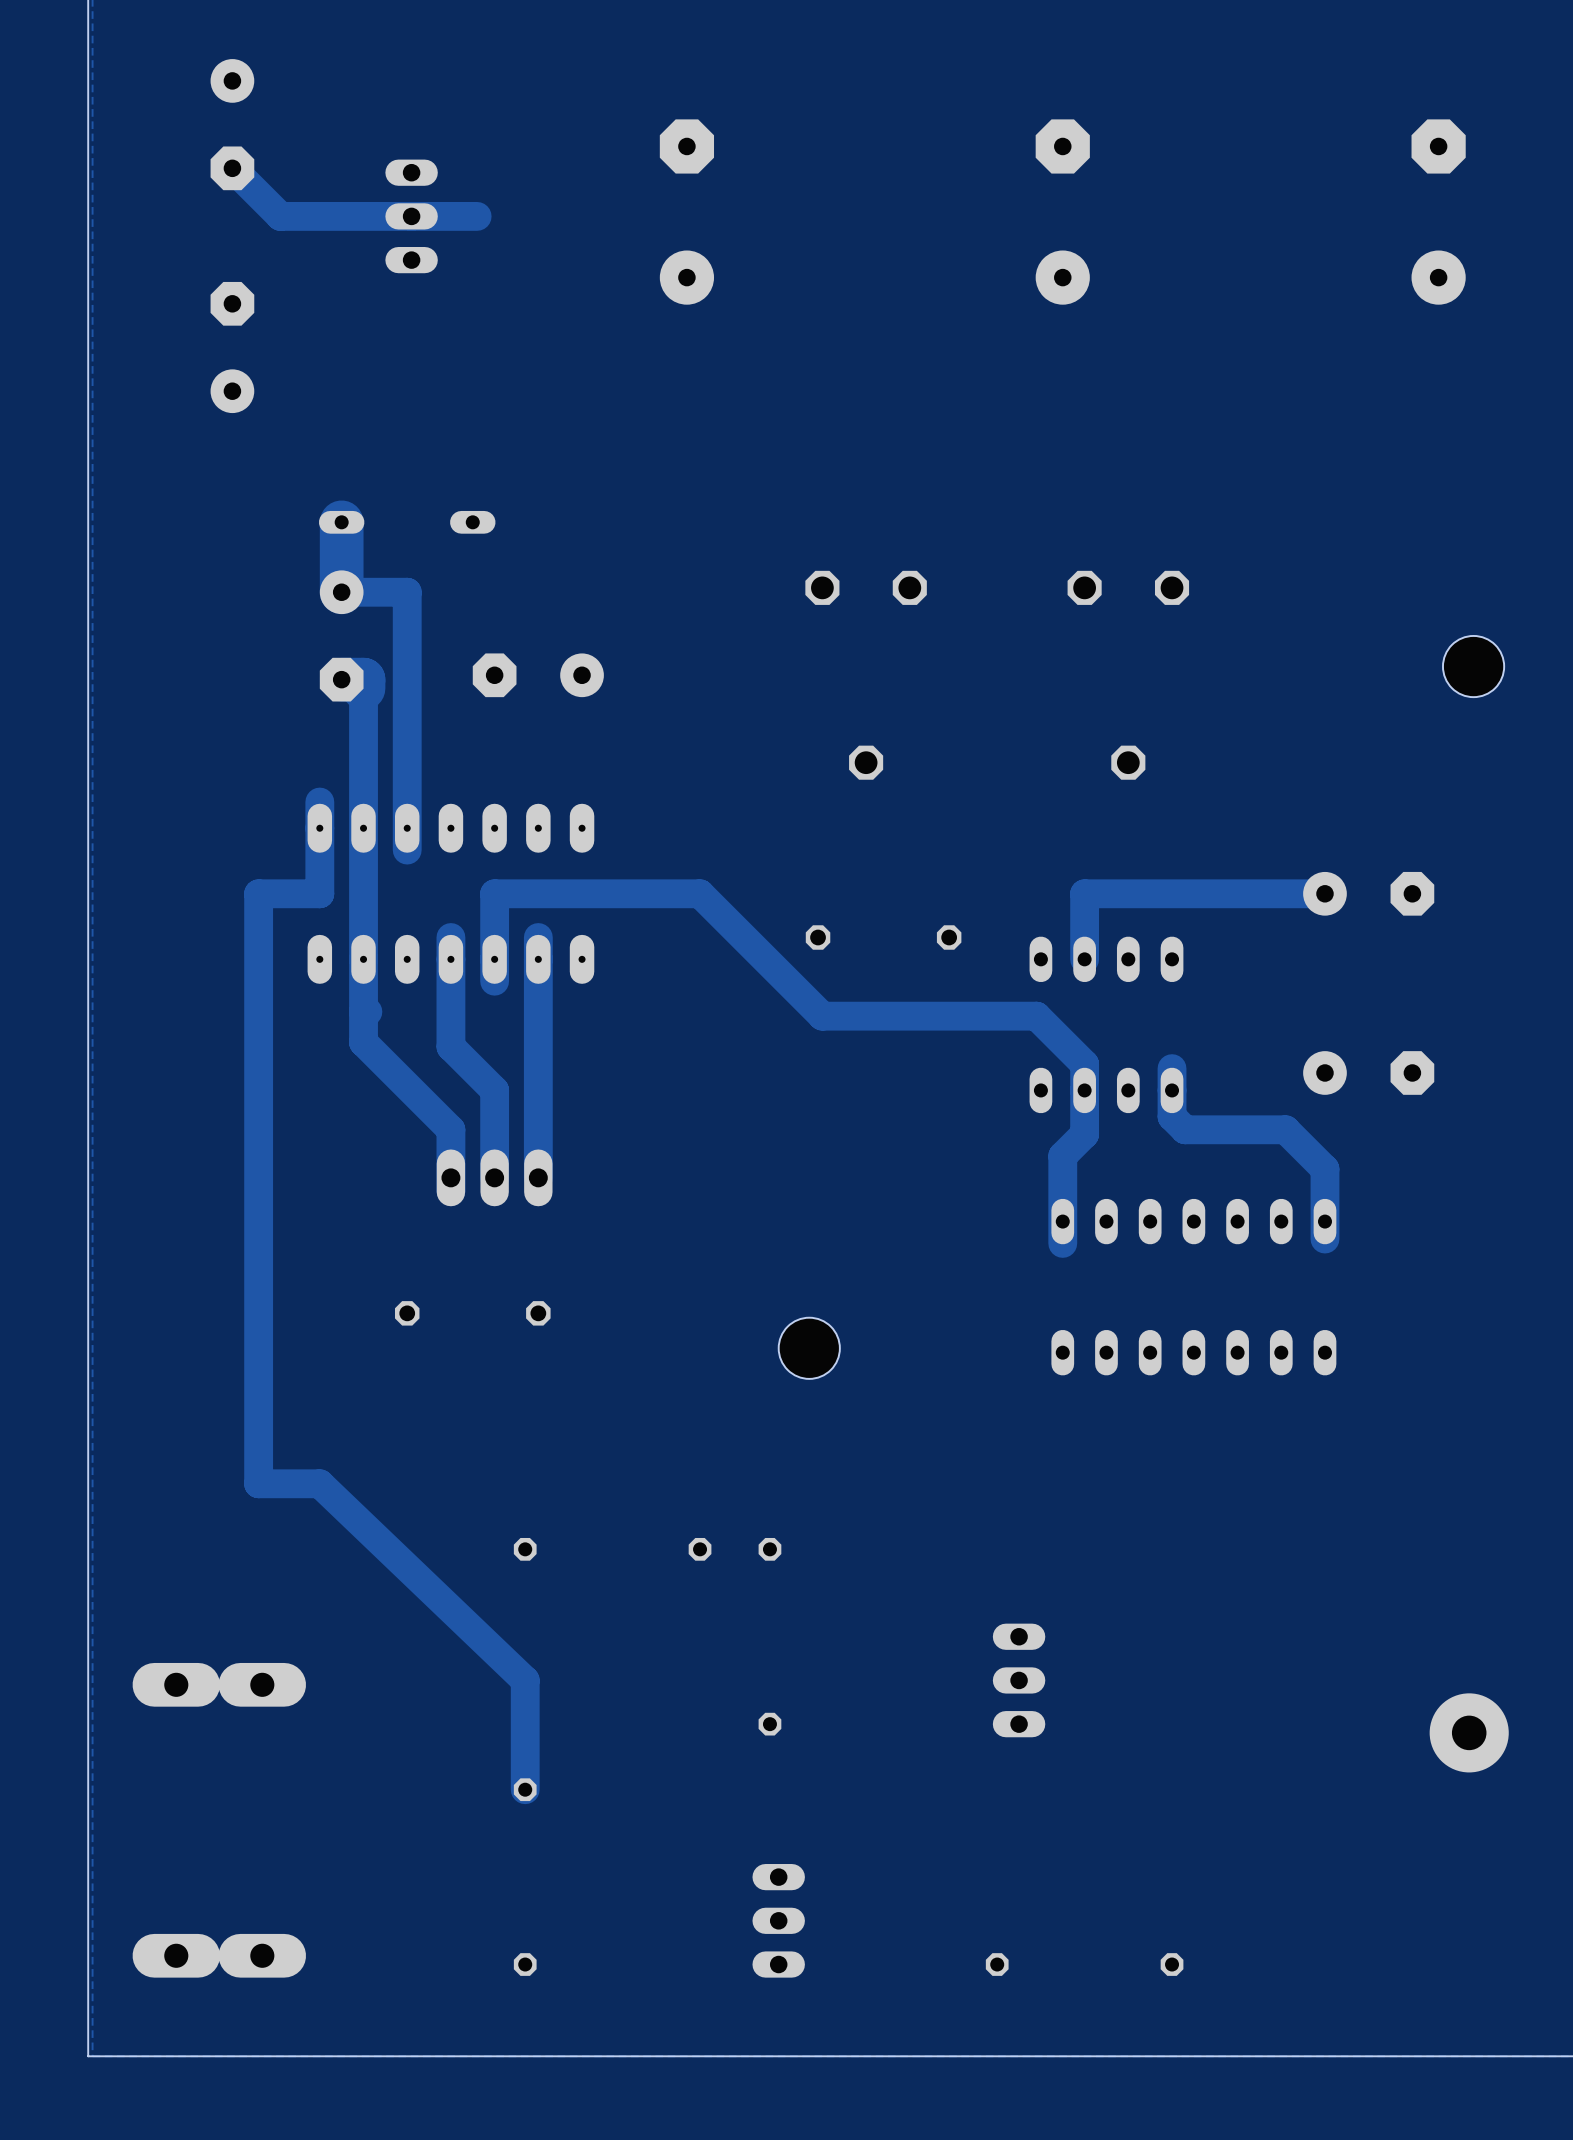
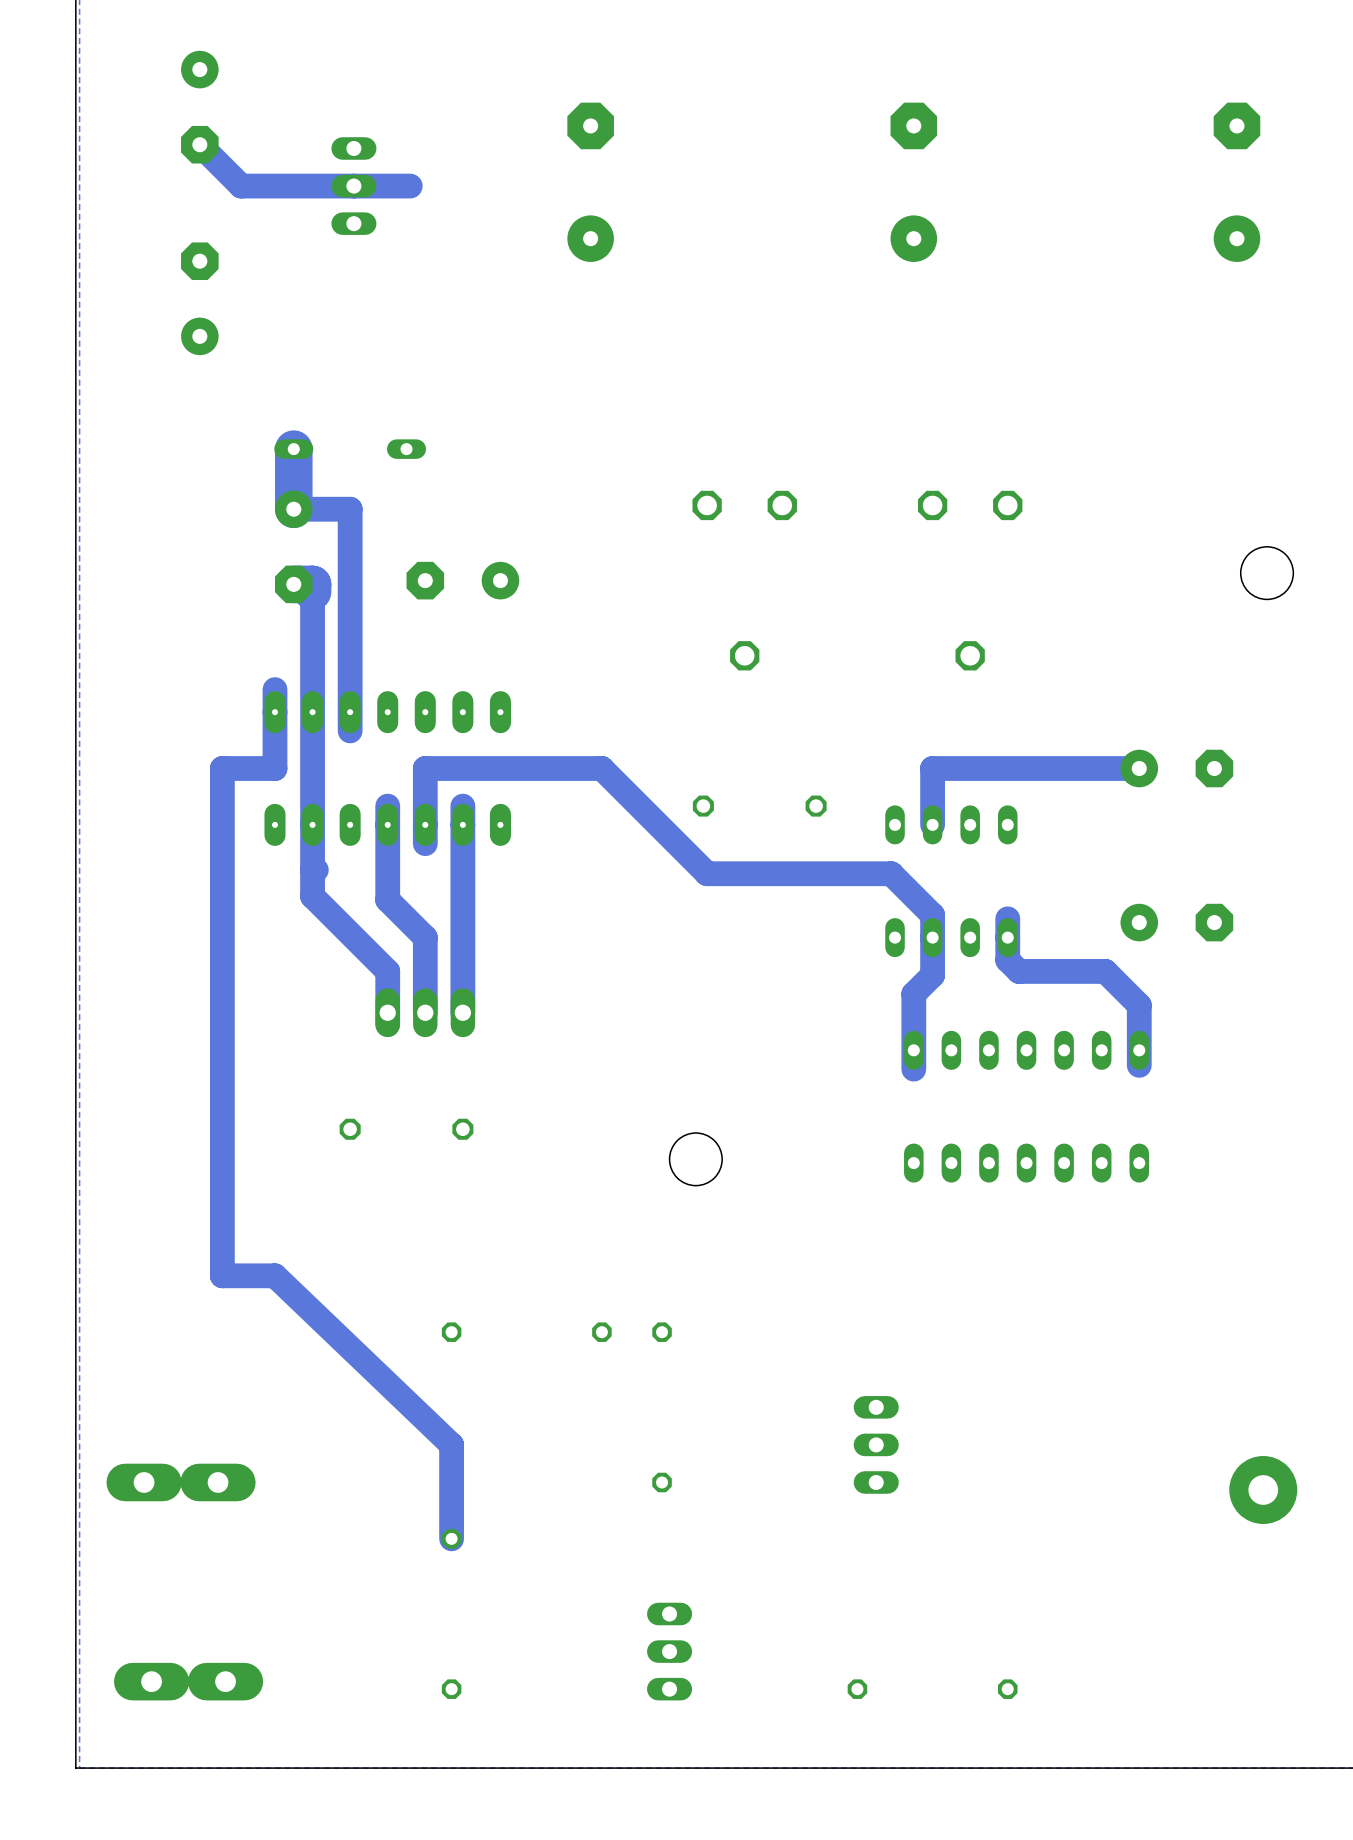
part position: (219, 1684) -> (181, 1482)

